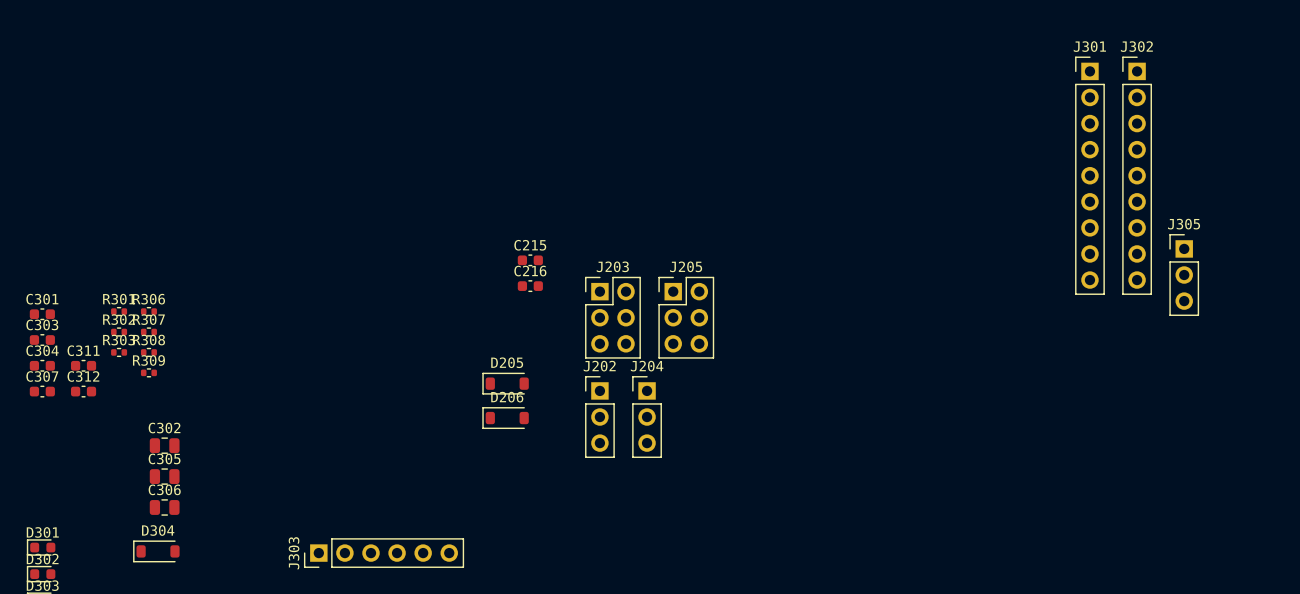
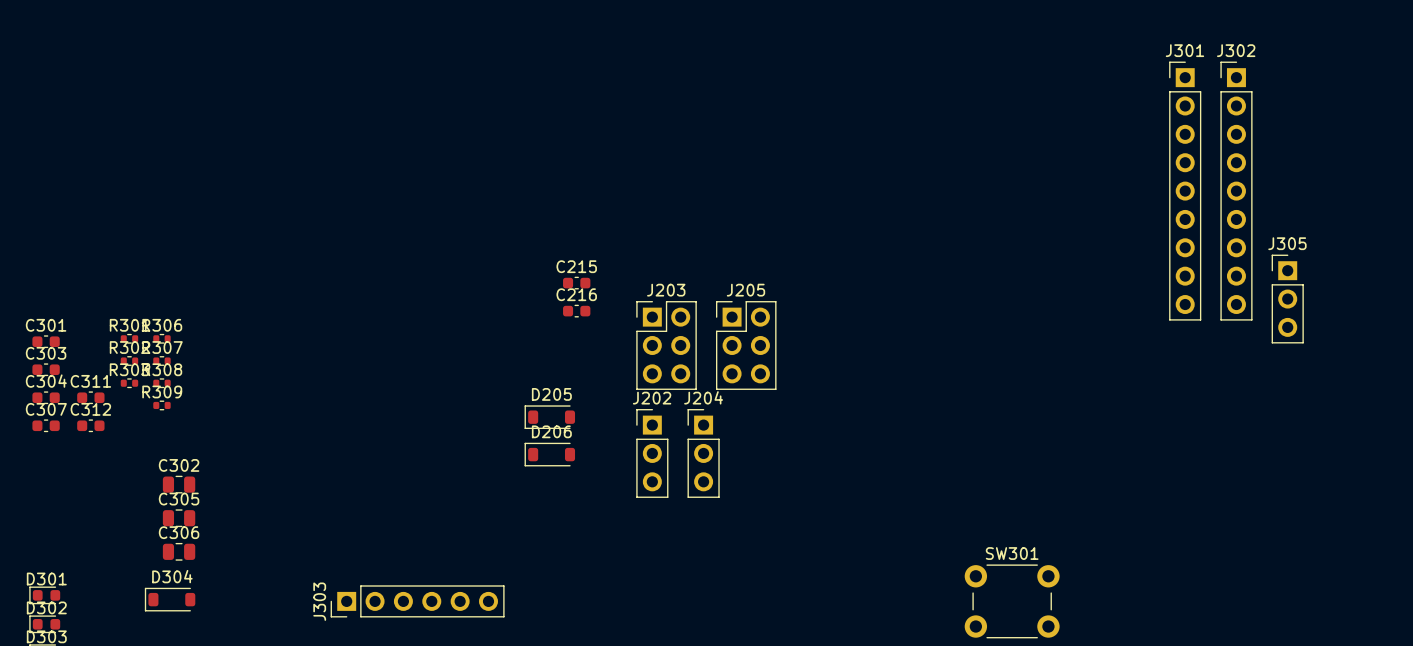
SW301: none -> (1012, 601)

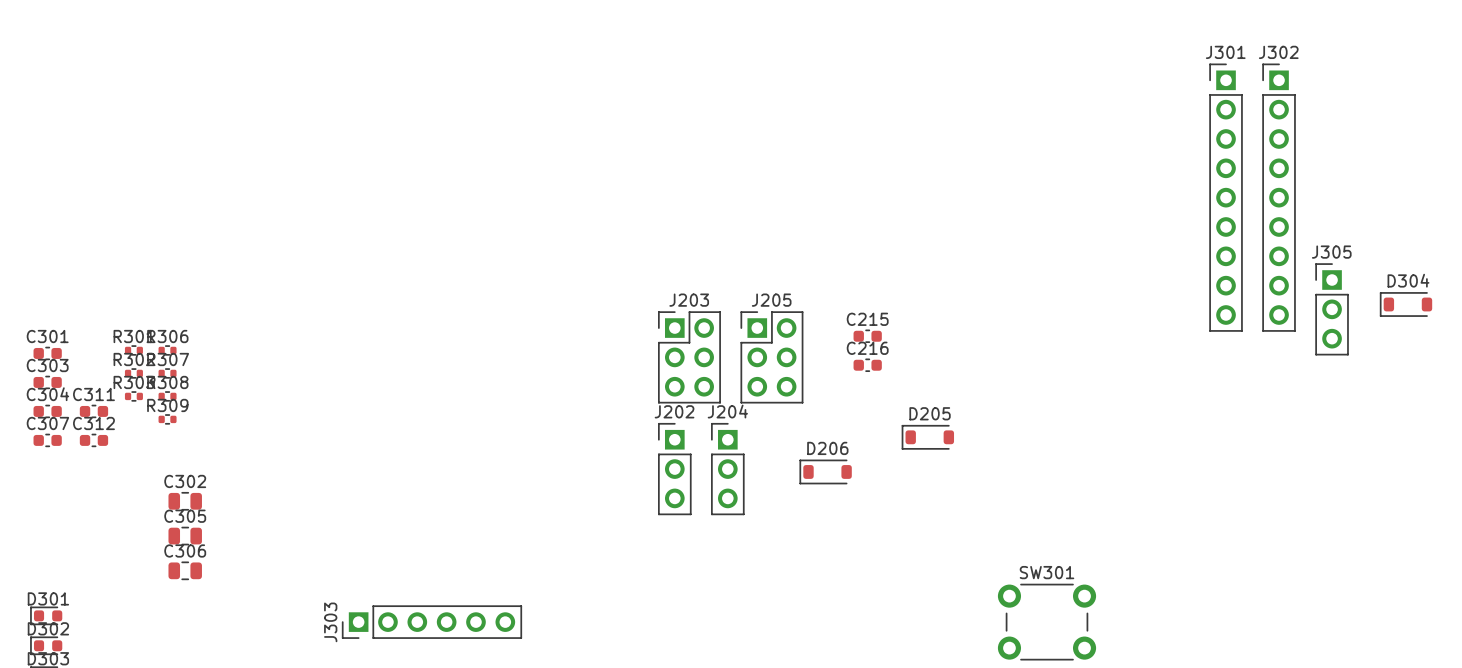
C215 position: (576, 283) -> (867, 336)
C216 position: (576, 311) -> (867, 365)
D205 position: (549, 417) -> (927, 437)
D206 position: (549, 454) -> (825, 471)
D304 position: (170, 599) -> (1406, 304)

